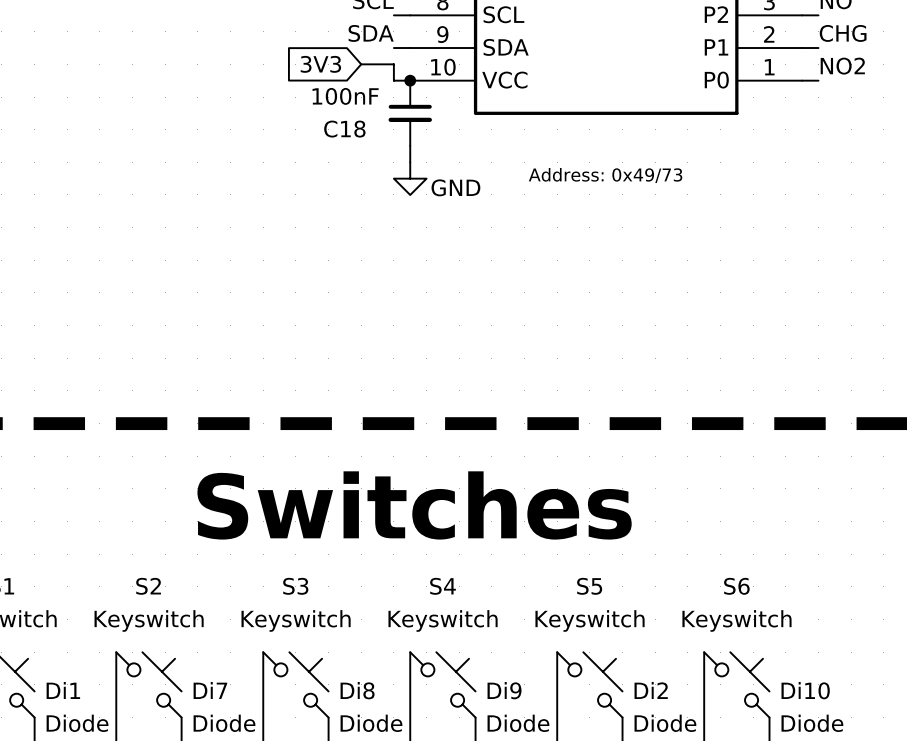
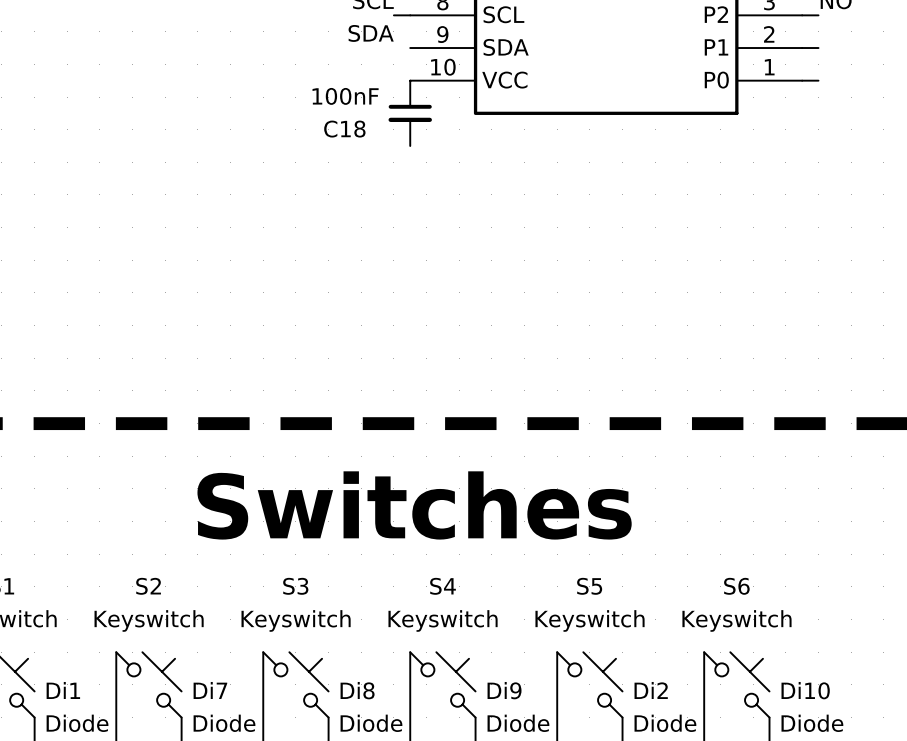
label: CHG (843, 33) -> none
wire: (393, 48) (410, 48) -> none
global label: 3V3 (320, 64) -> none
wire: (361, 64) (393, 64) (393, 80) (410, 80) -> none
label: NO2 (842, 66) -> none
junction: (410, 80) -> none
wire: (410, 145) (410, 162) -> none
text: Address: 0x49/73 (605, 175) -> none
power symbol: GND (410, 178) -> none

